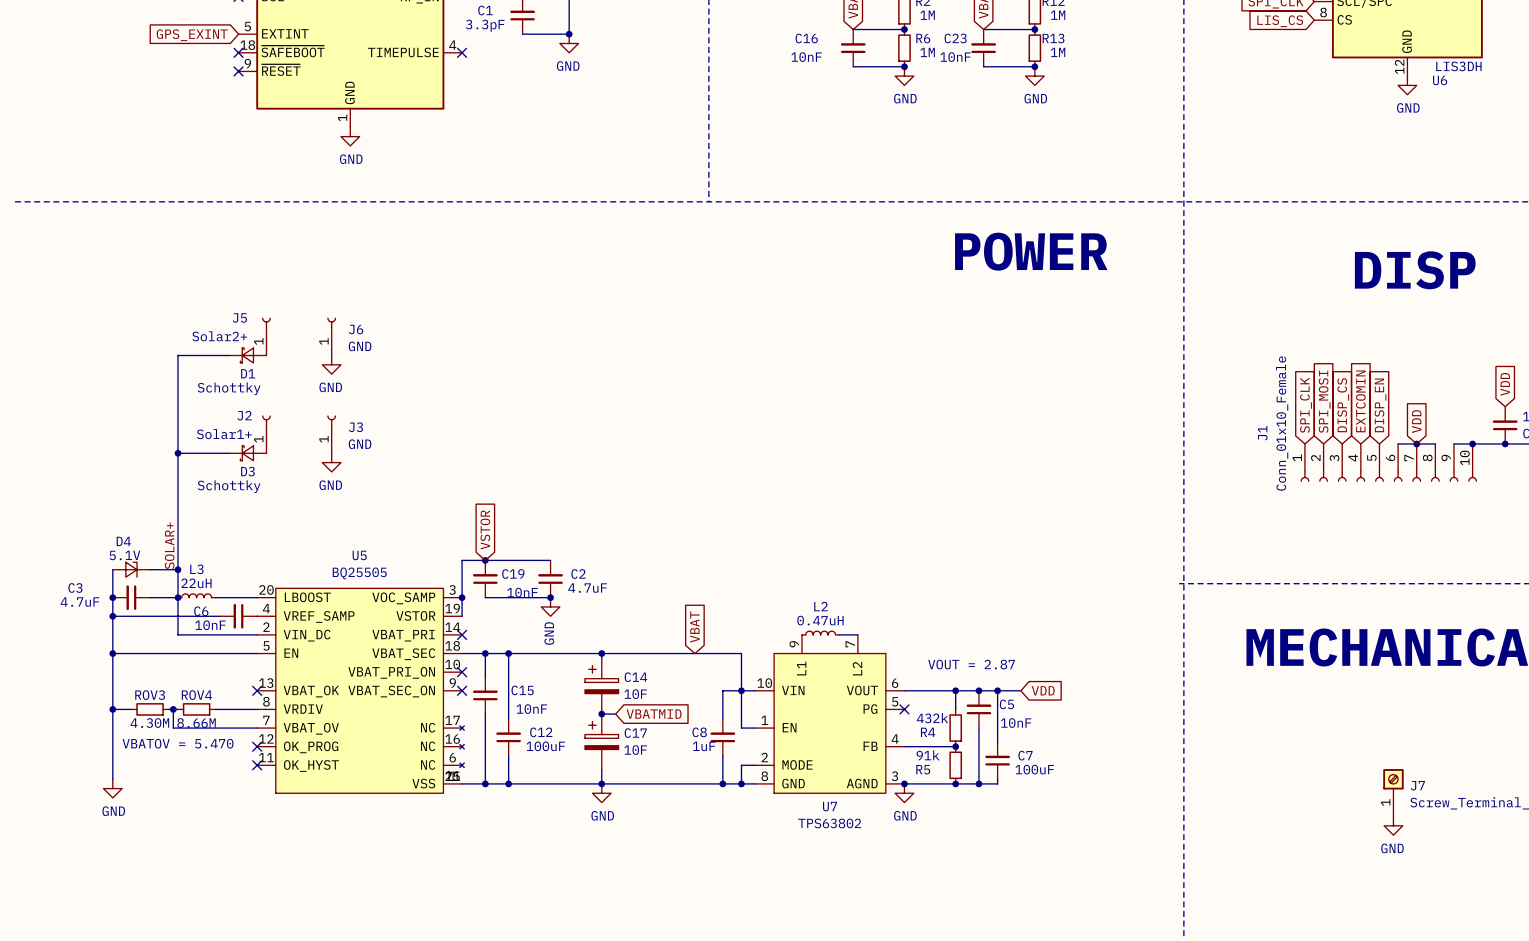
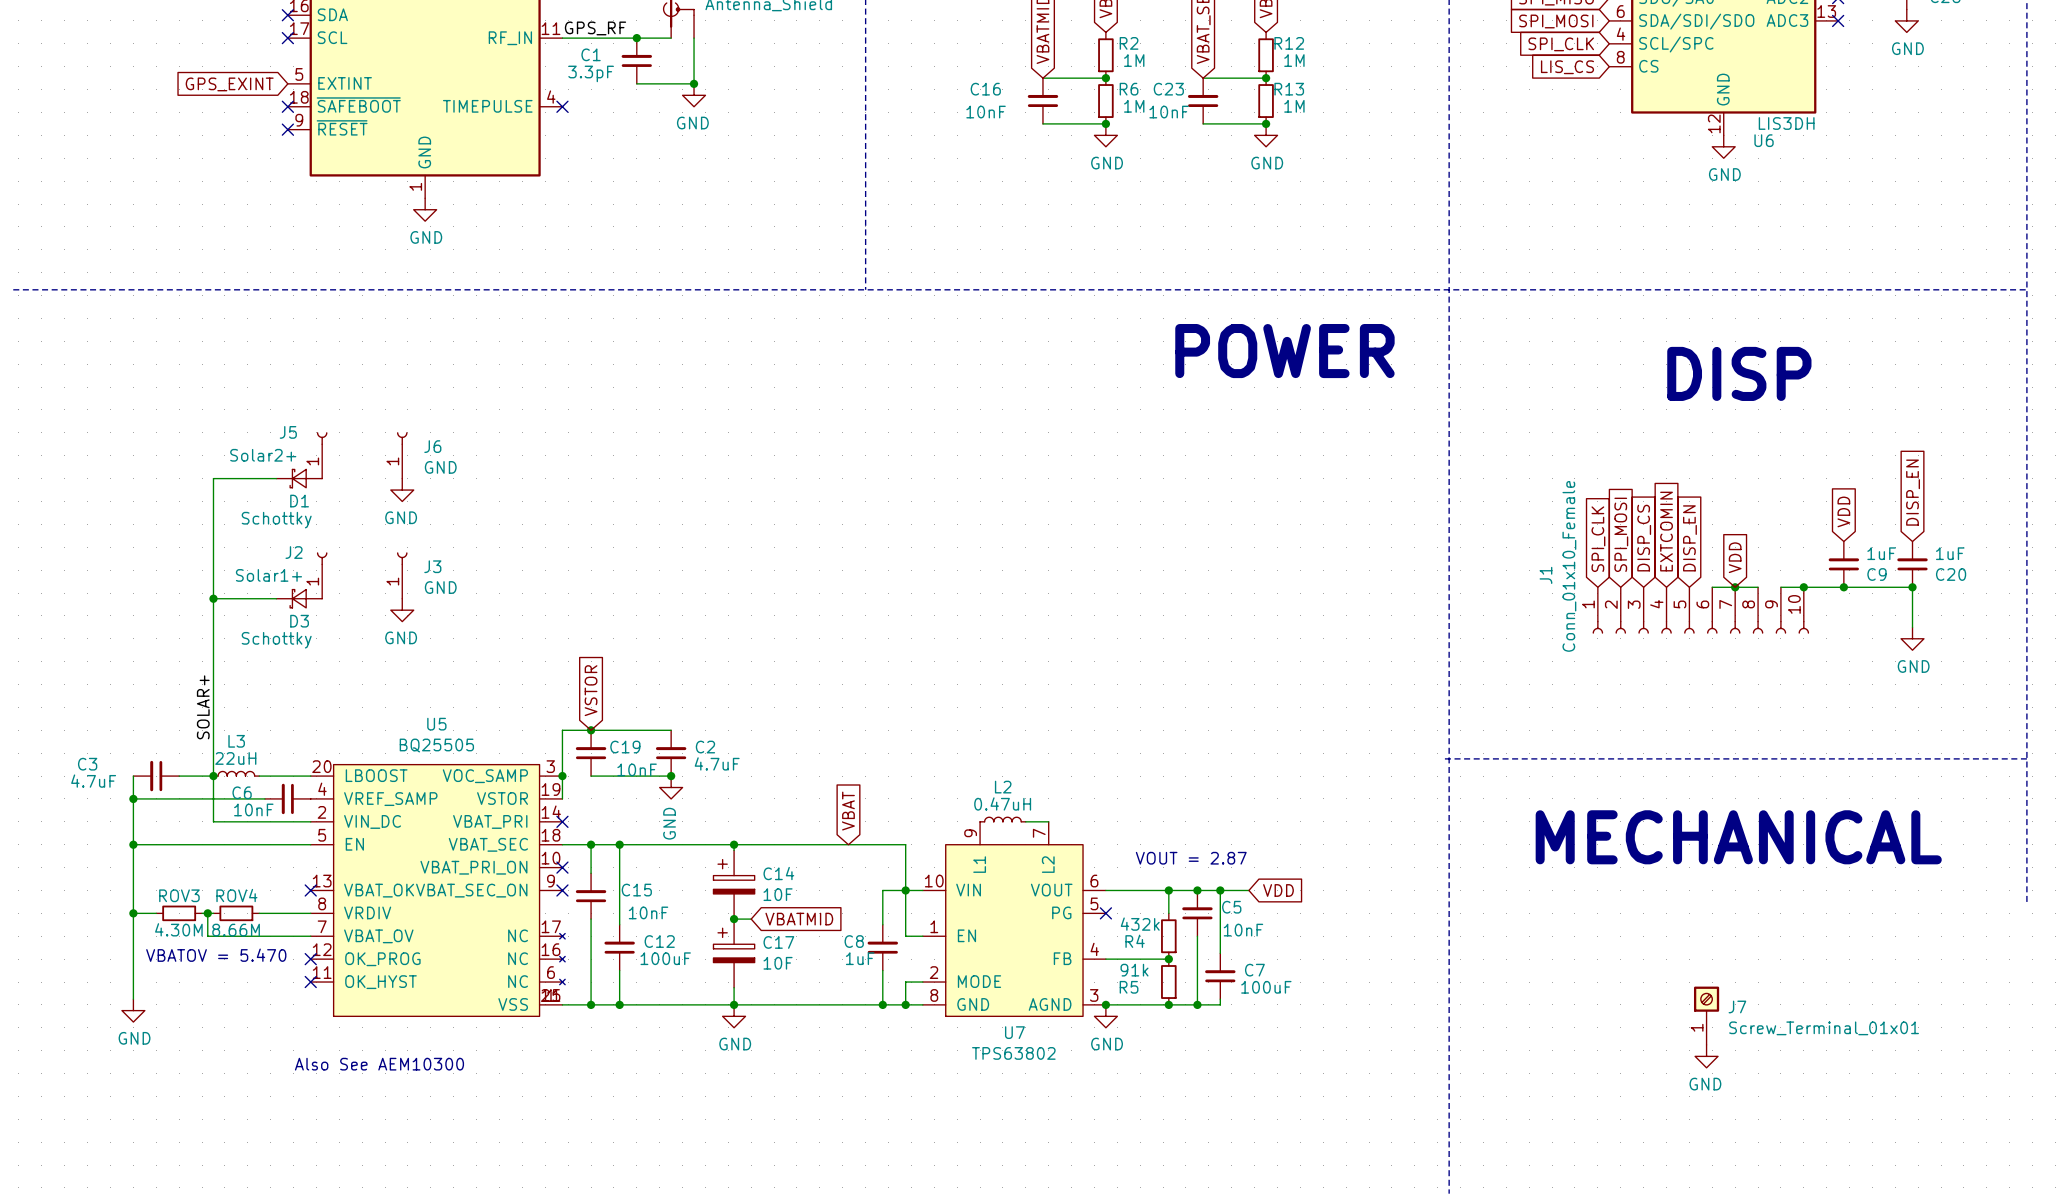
wire: (112, 569) (112, 597) -> none
D4: 5.1V (131, 569) -> none
wire: (150, 569) (178, 569) -> none
junction: (178, 569) -> none
junction: (112, 597) -> none
text: none -> Also See AEM10300 (379, 1064)

